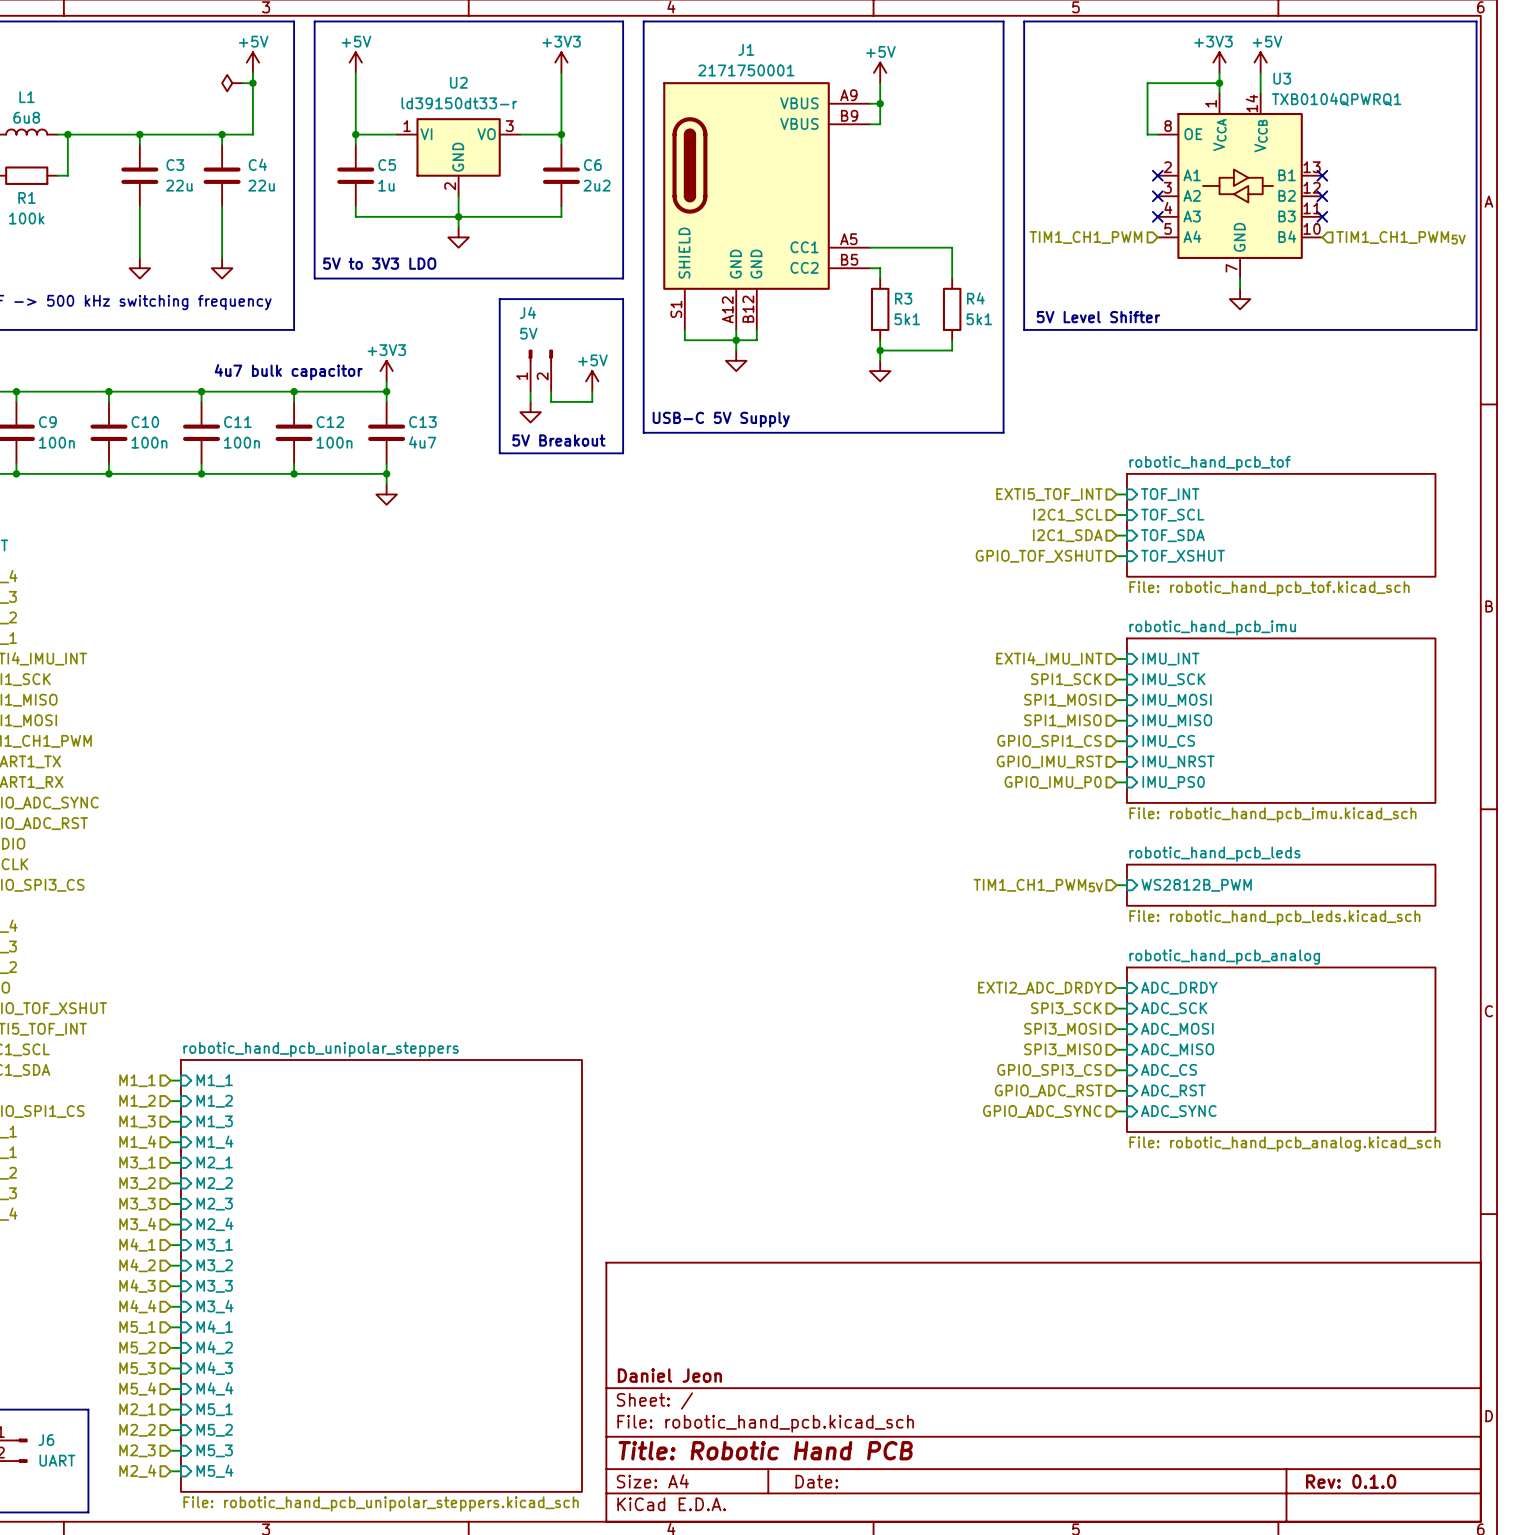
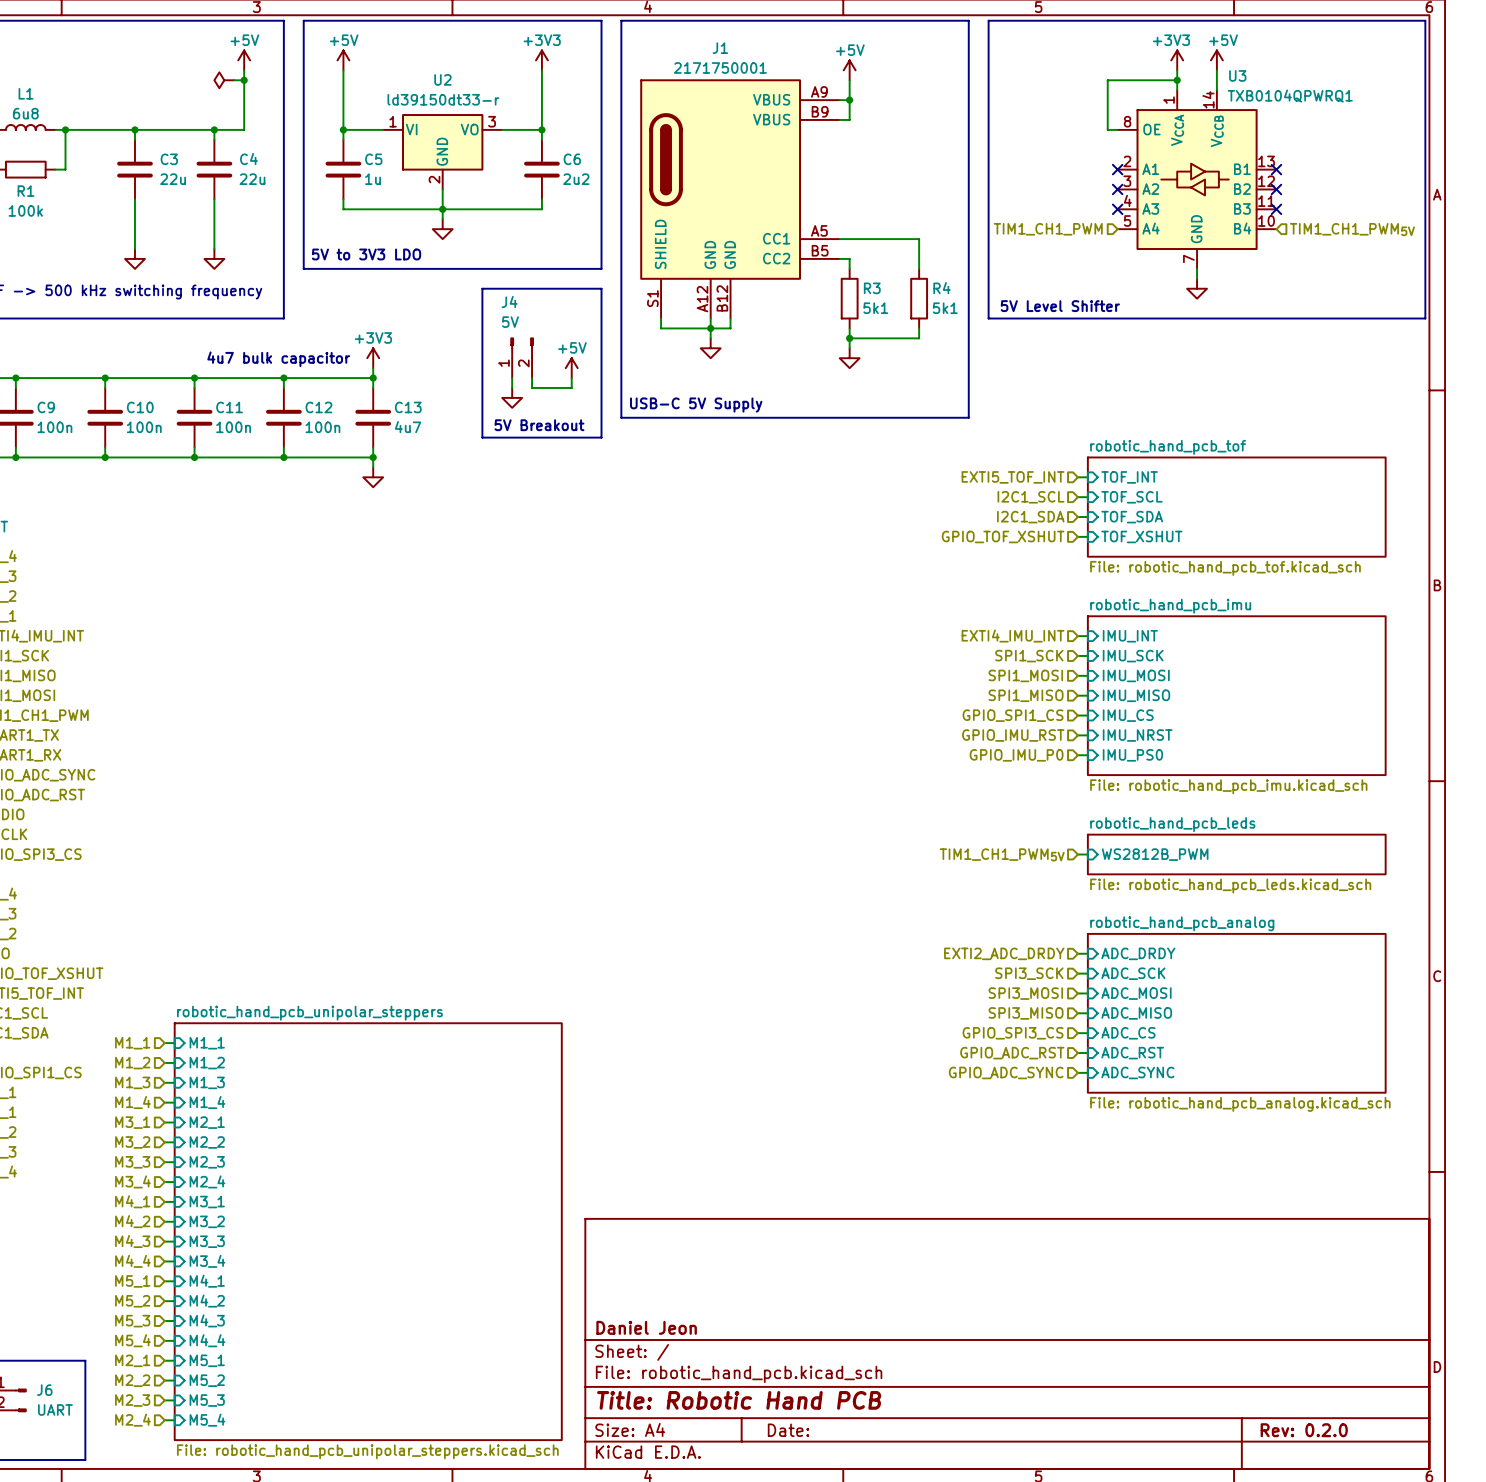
title block: Rev: 0.1.0 (1351, 1481) -> Rev: 0.2.0 (1304, 1430)

